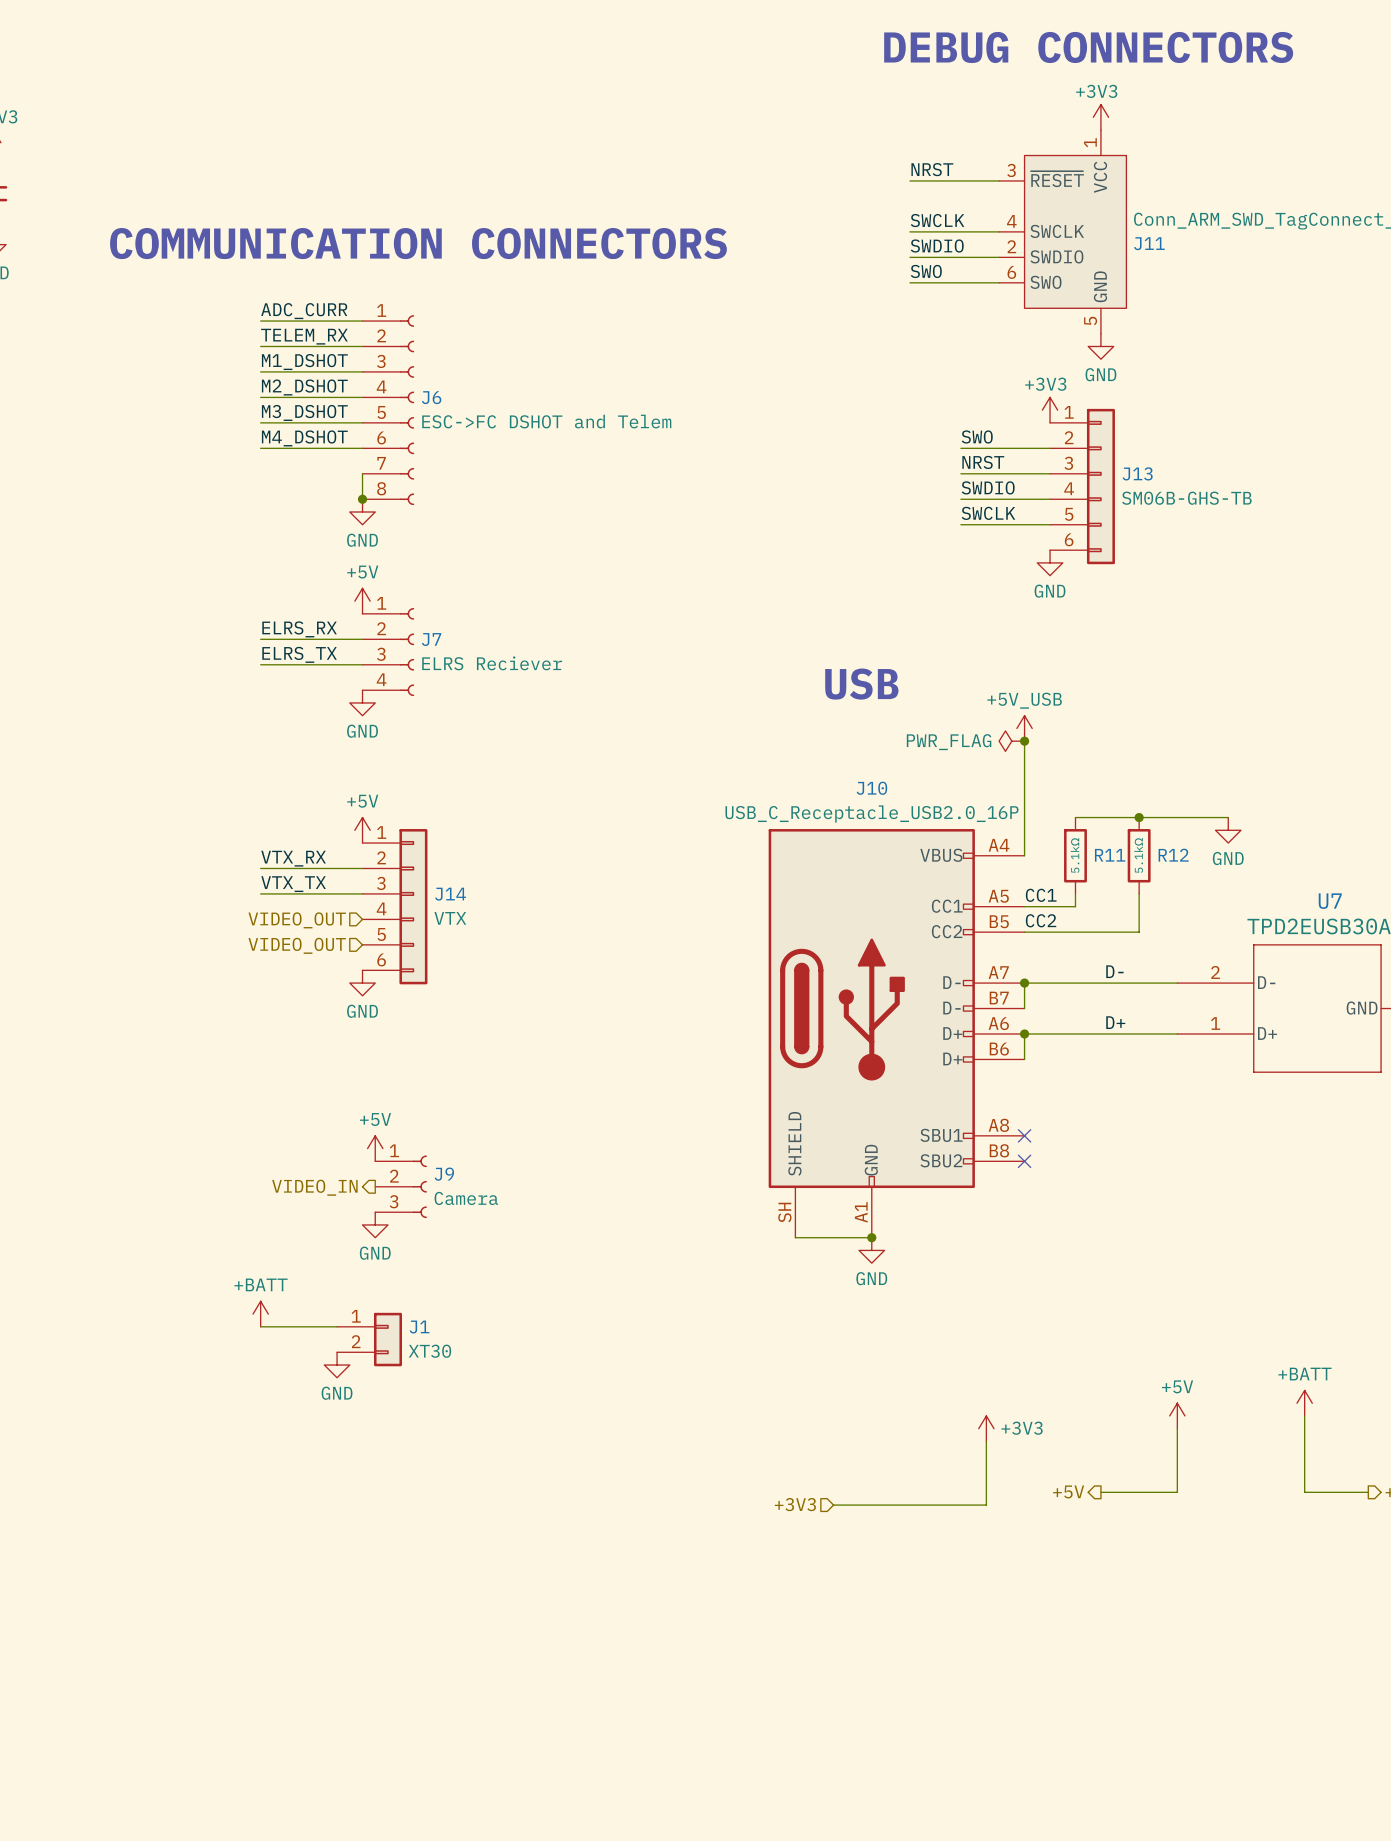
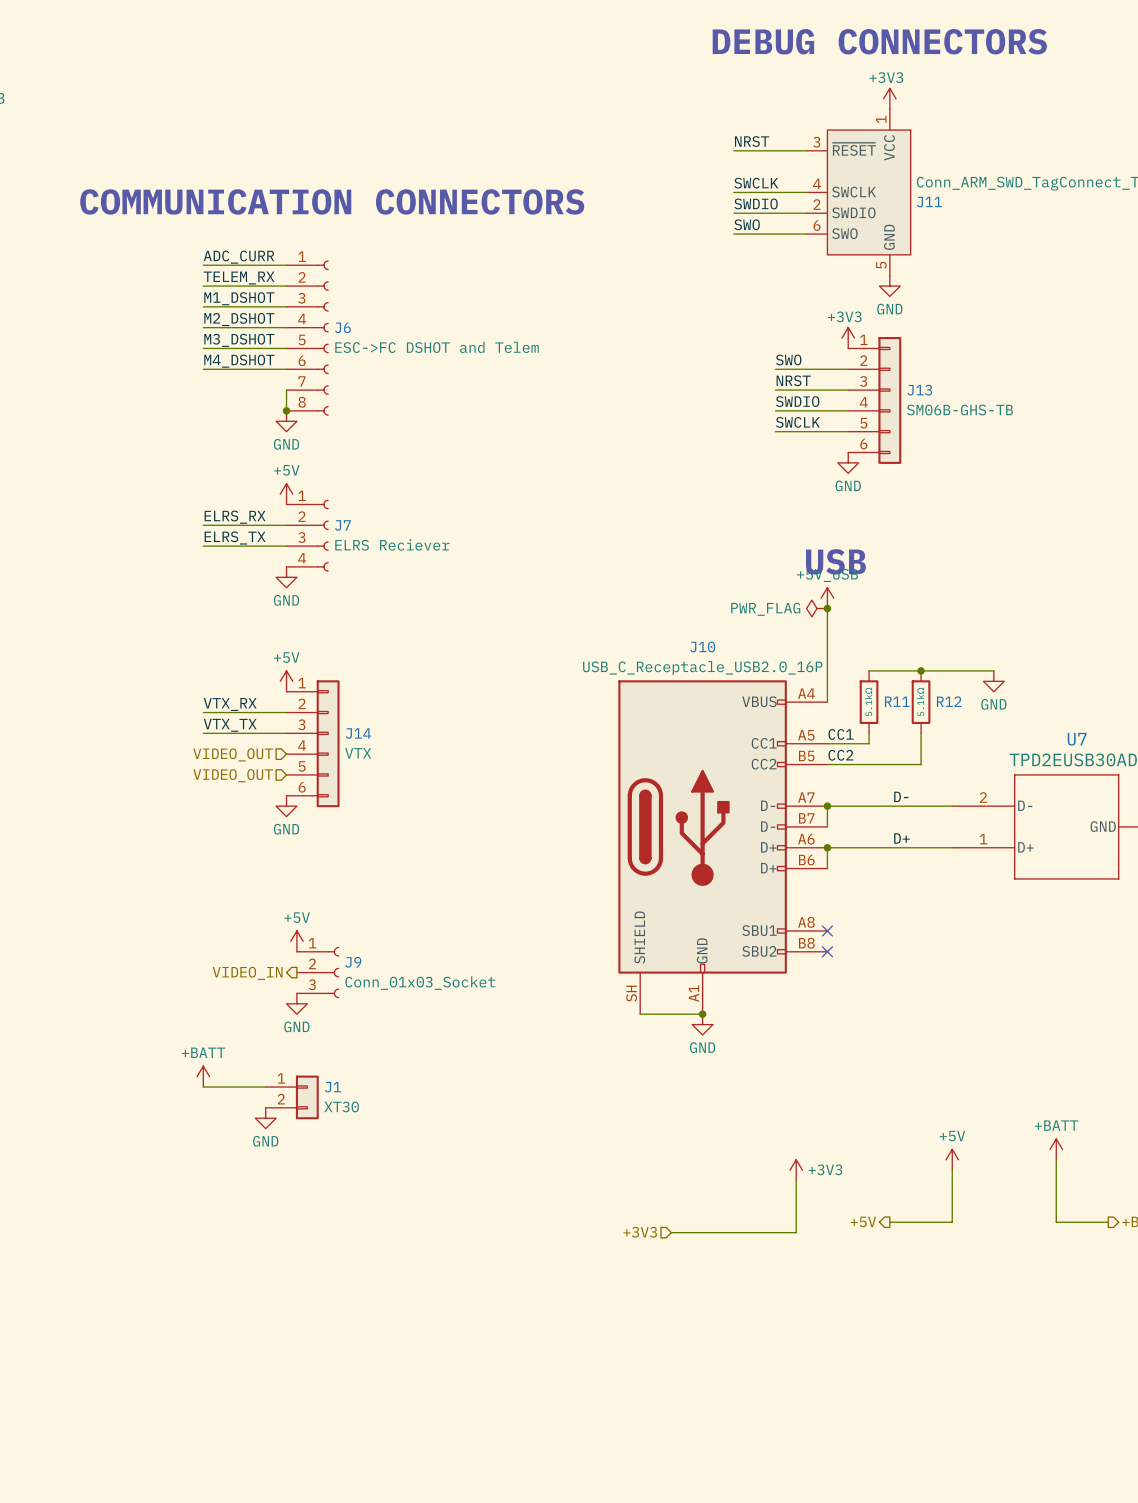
text position: USB (861, 684) -> USB (835, 561)
J9 value: Camera (466, 1198) -> Conn_01x03_Socket (420, 983)

